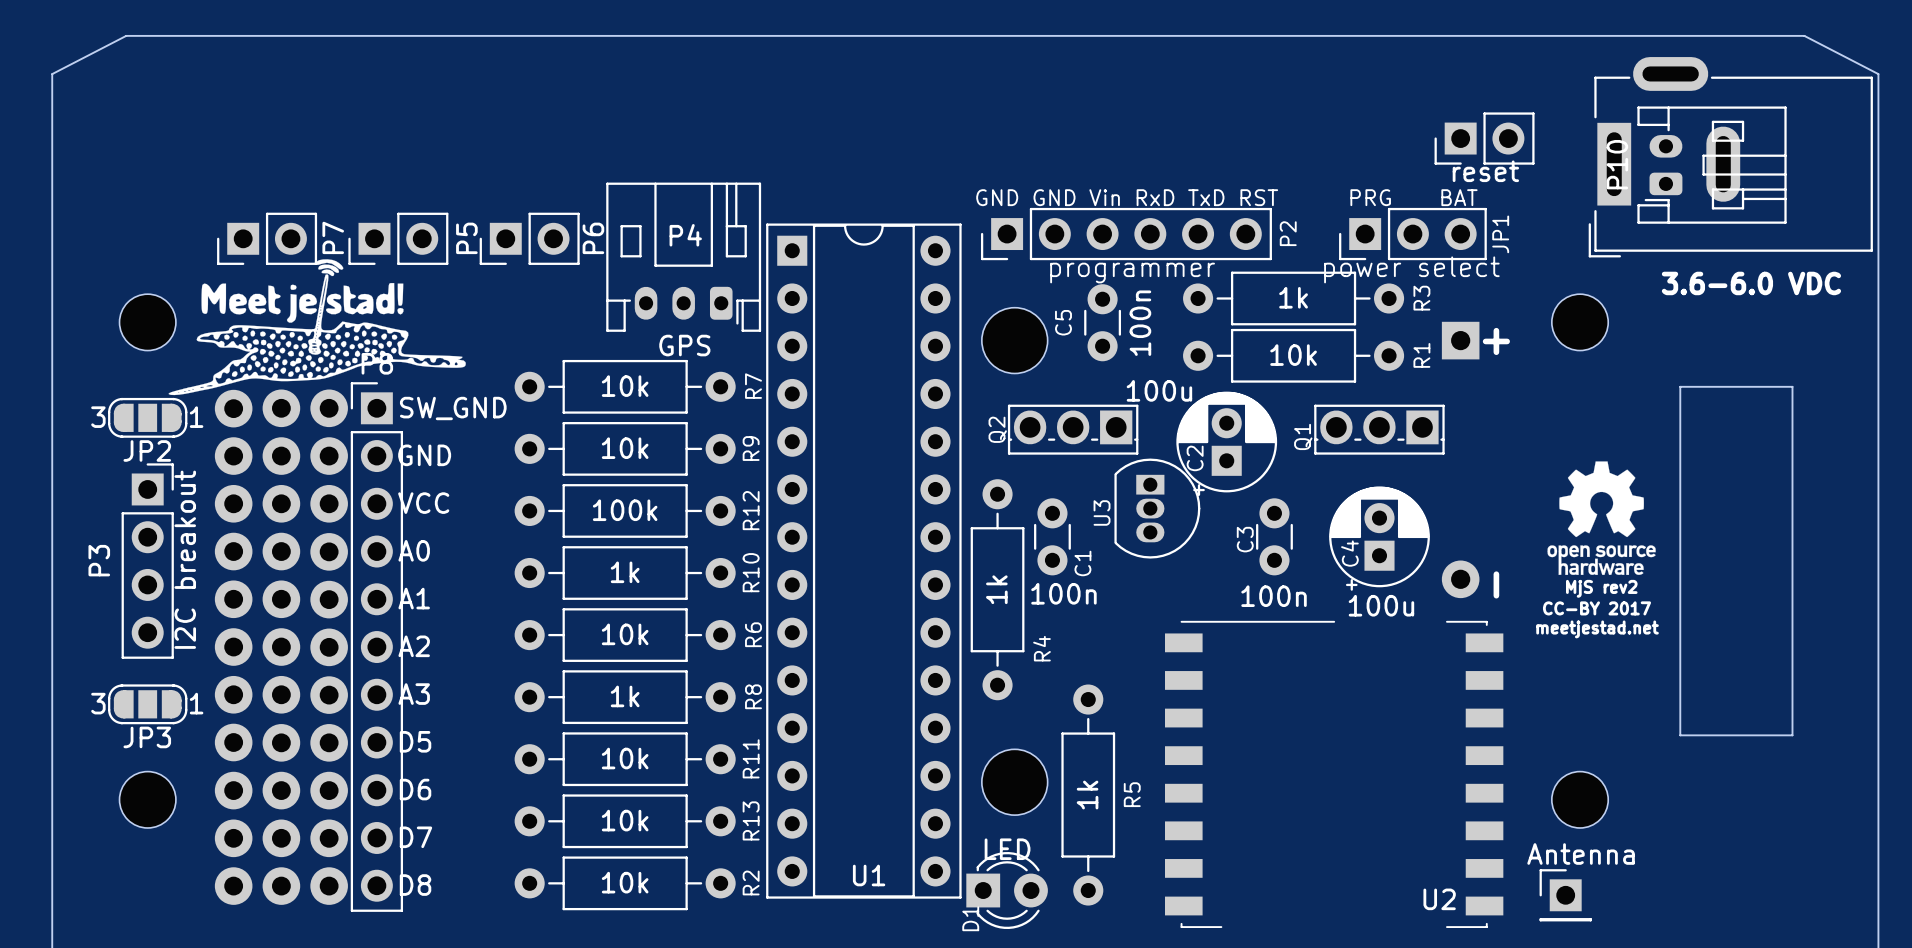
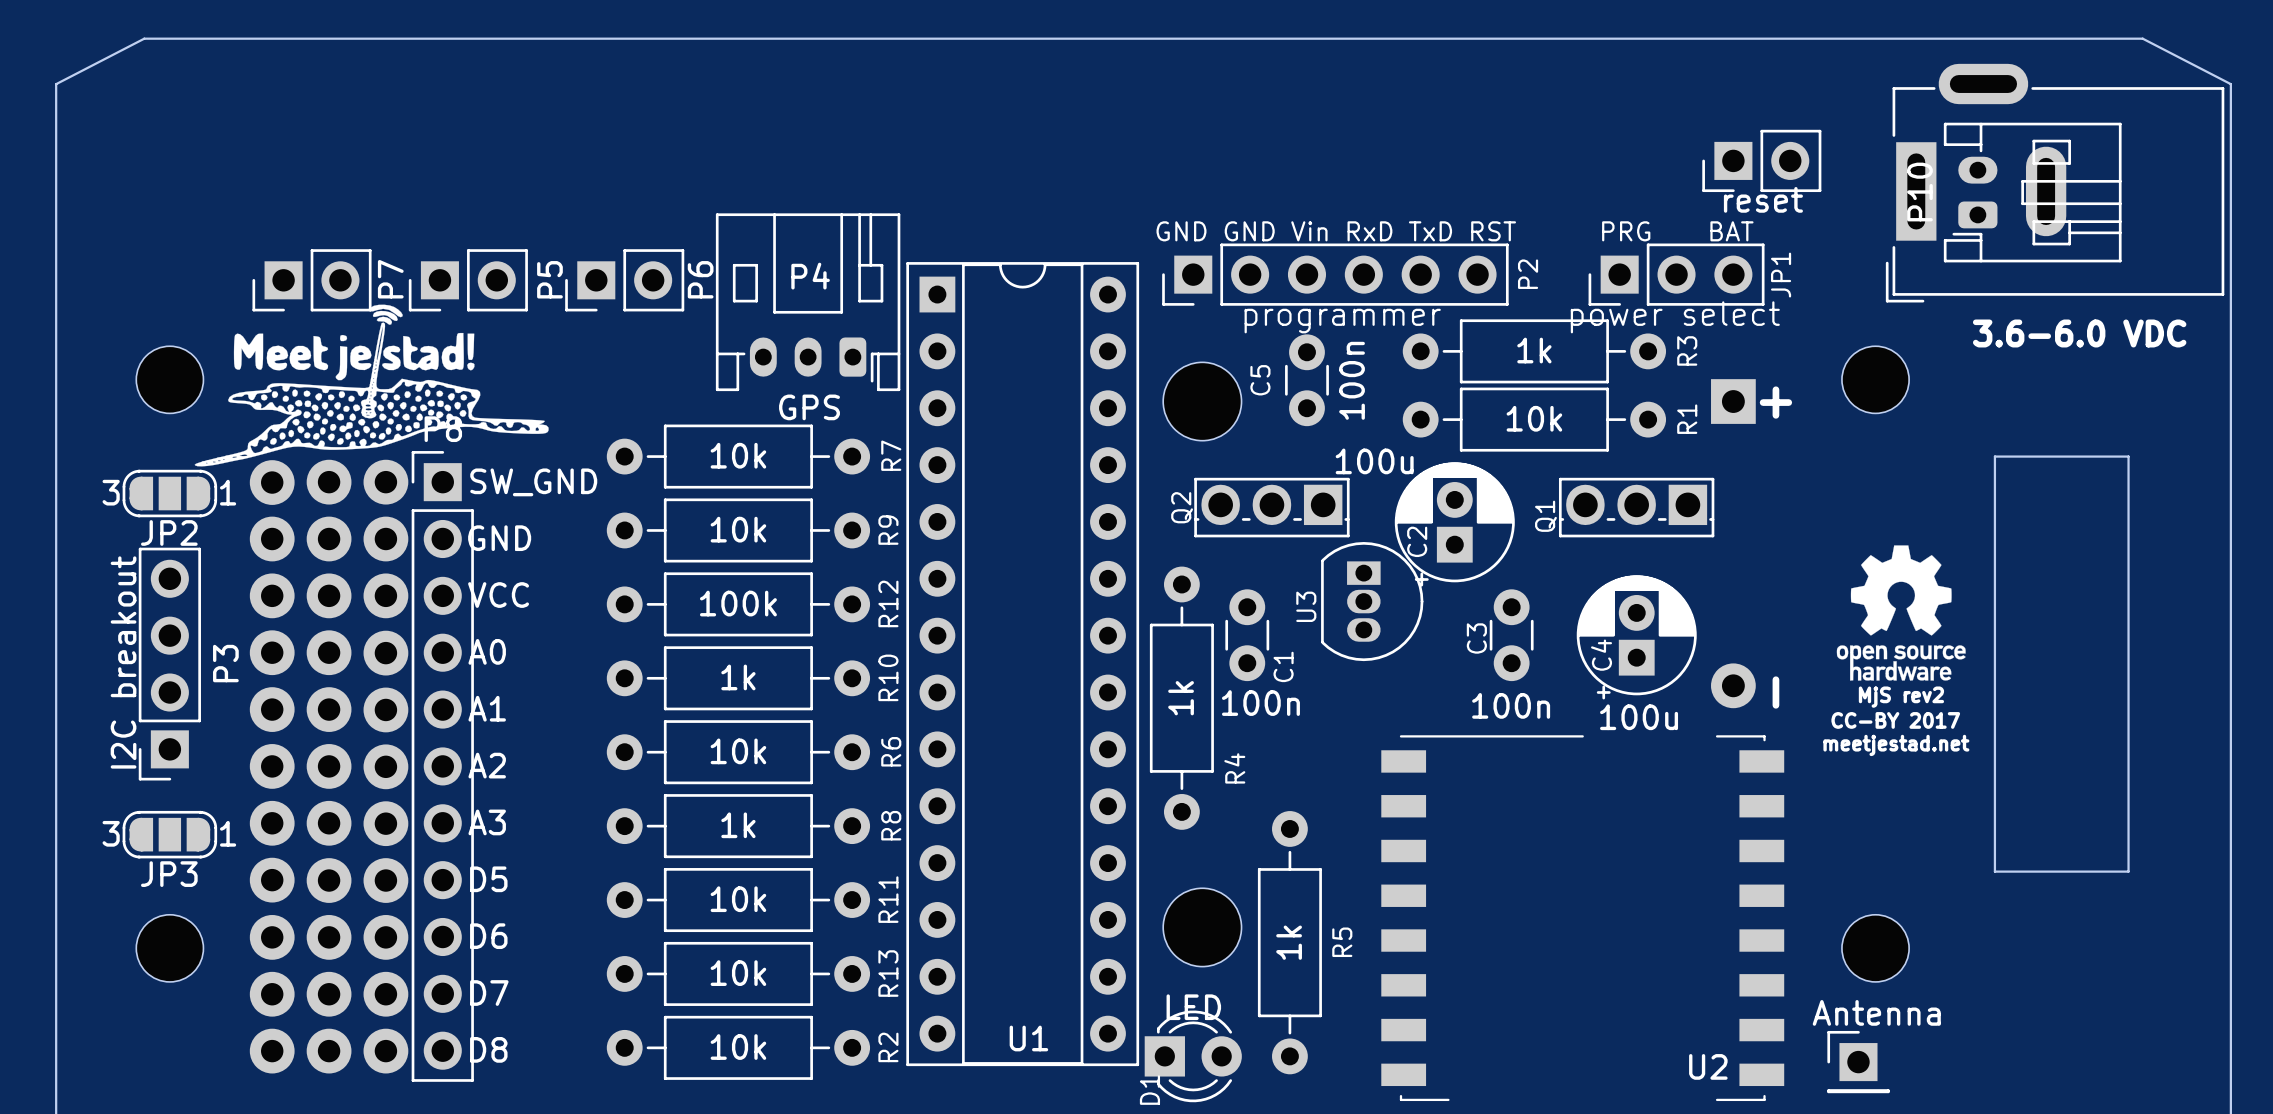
P3 rotation: 0° (147, 561) -> 180° (169, 664)

